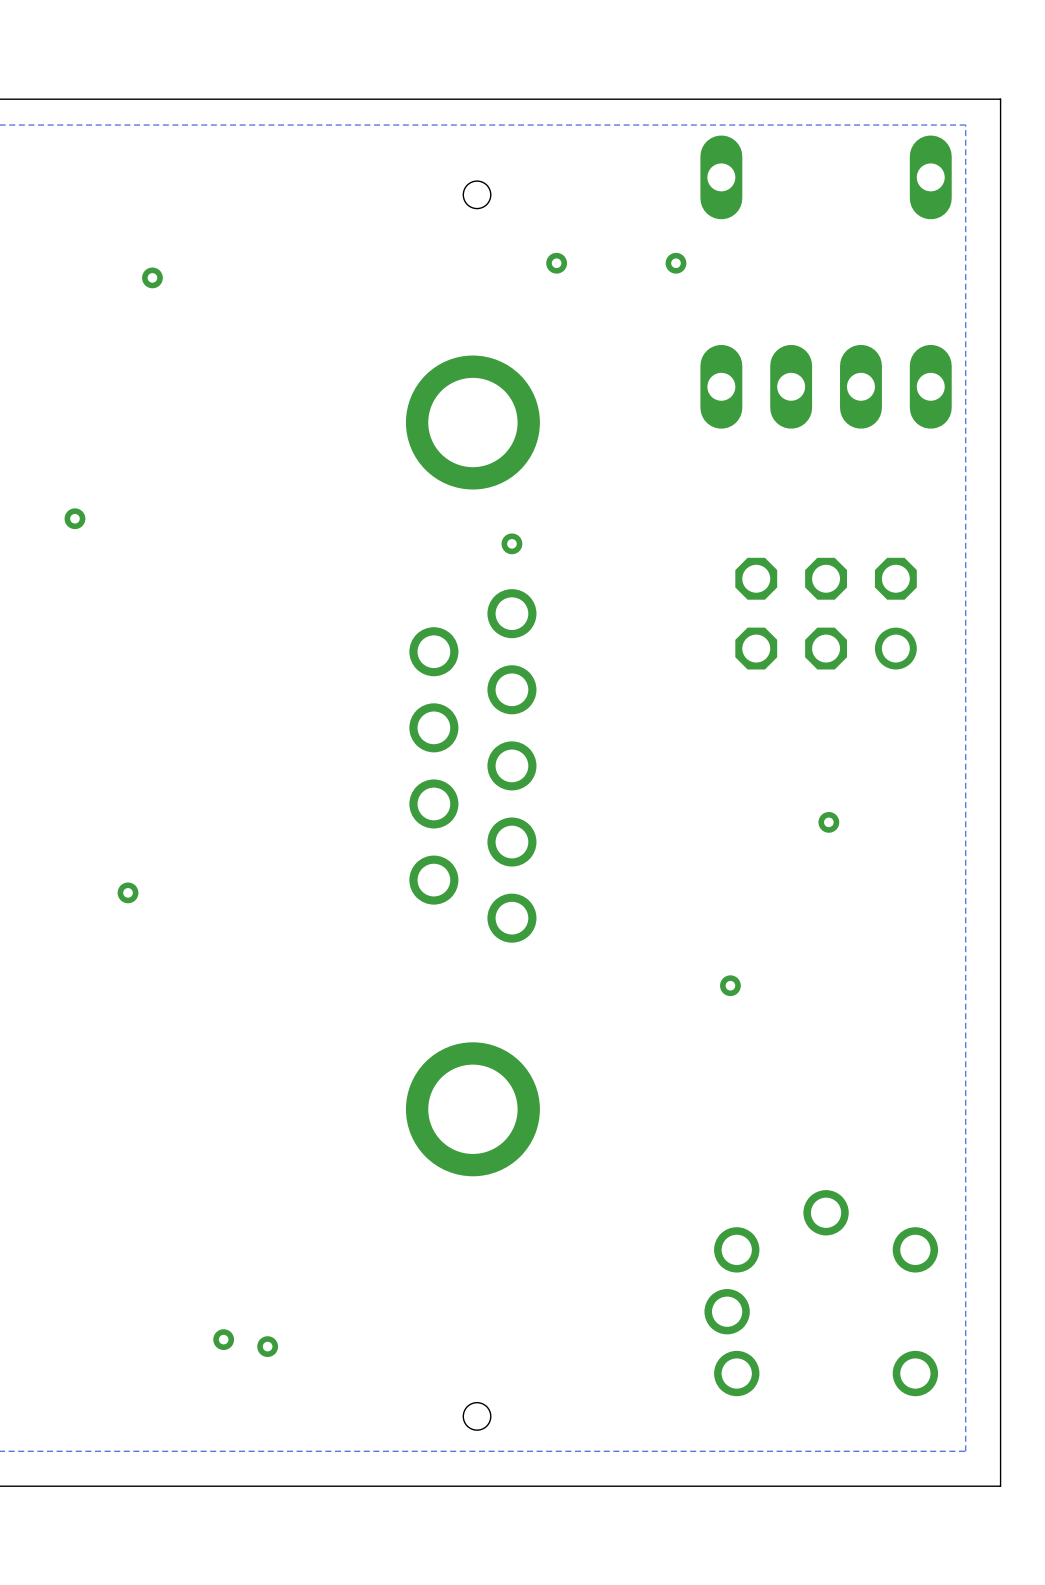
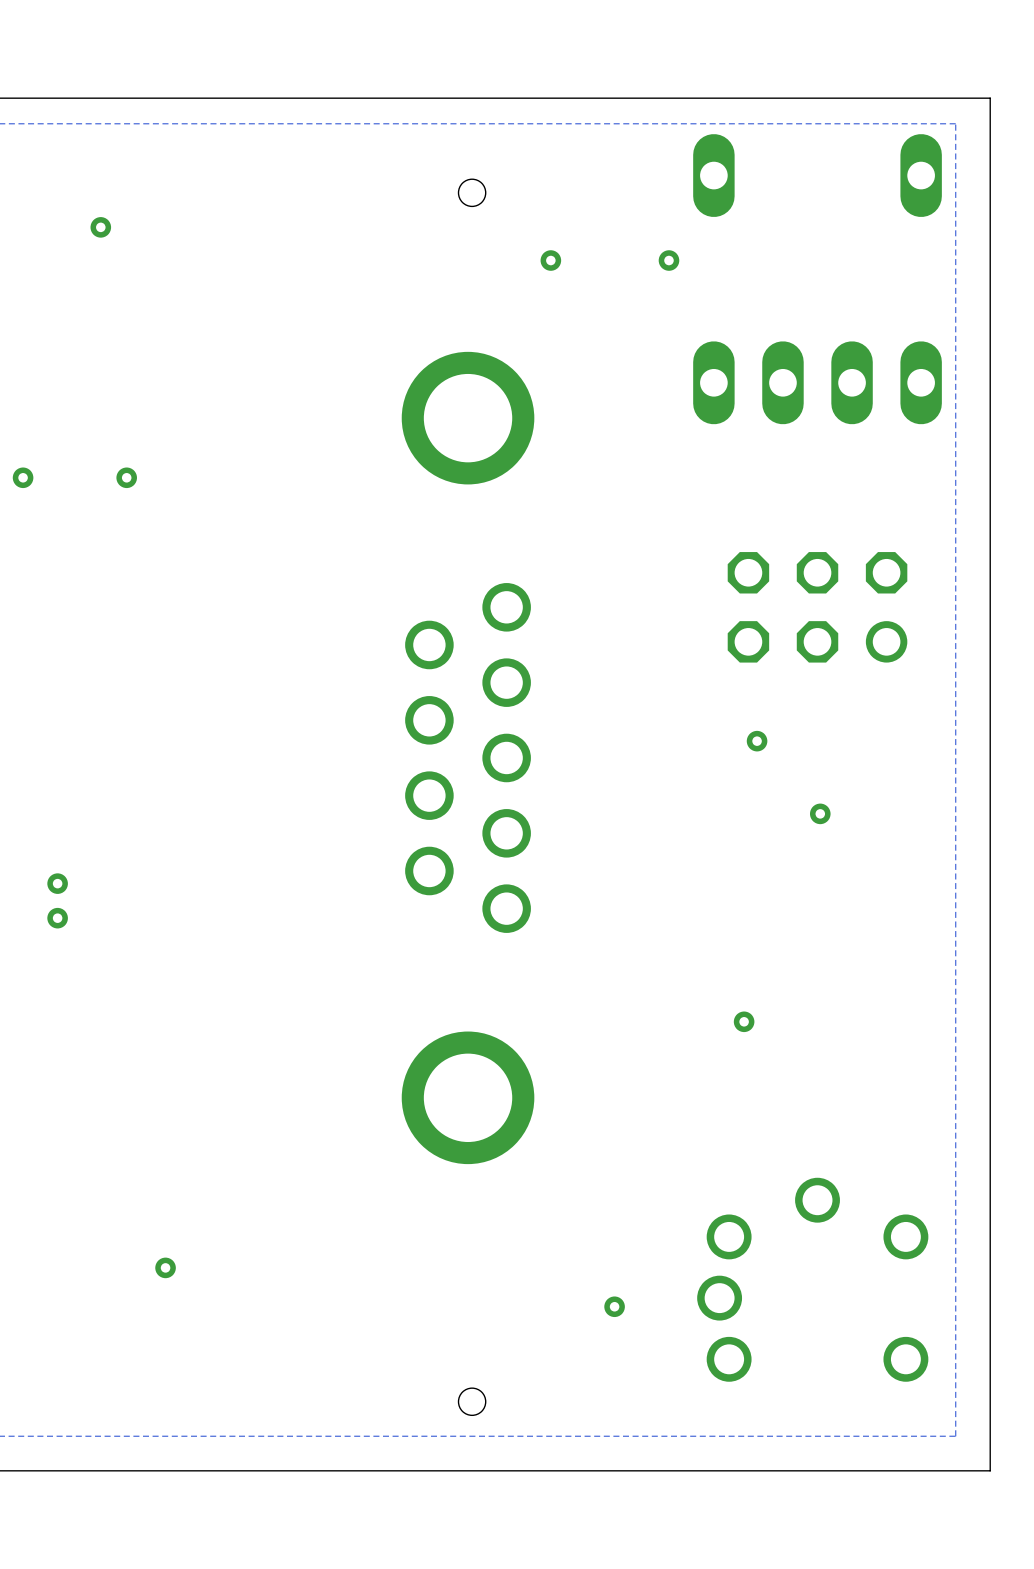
via position: (152, 277) -> (100, 227)
via: none -> (23, 477)
via: none -> (126, 477)
via: (74, 518) -> none
via: (511, 543) -> none
via: none -> (757, 741)
via: none -> (57, 883)
via: (128, 892) -> none
via: none -> (57, 918)
via position: (730, 985) -> (744, 1021)
via: none -> (165, 1267)
via: none -> (614, 1306)
via: (223, 1339) -> none
via: (267, 1346) -> none

